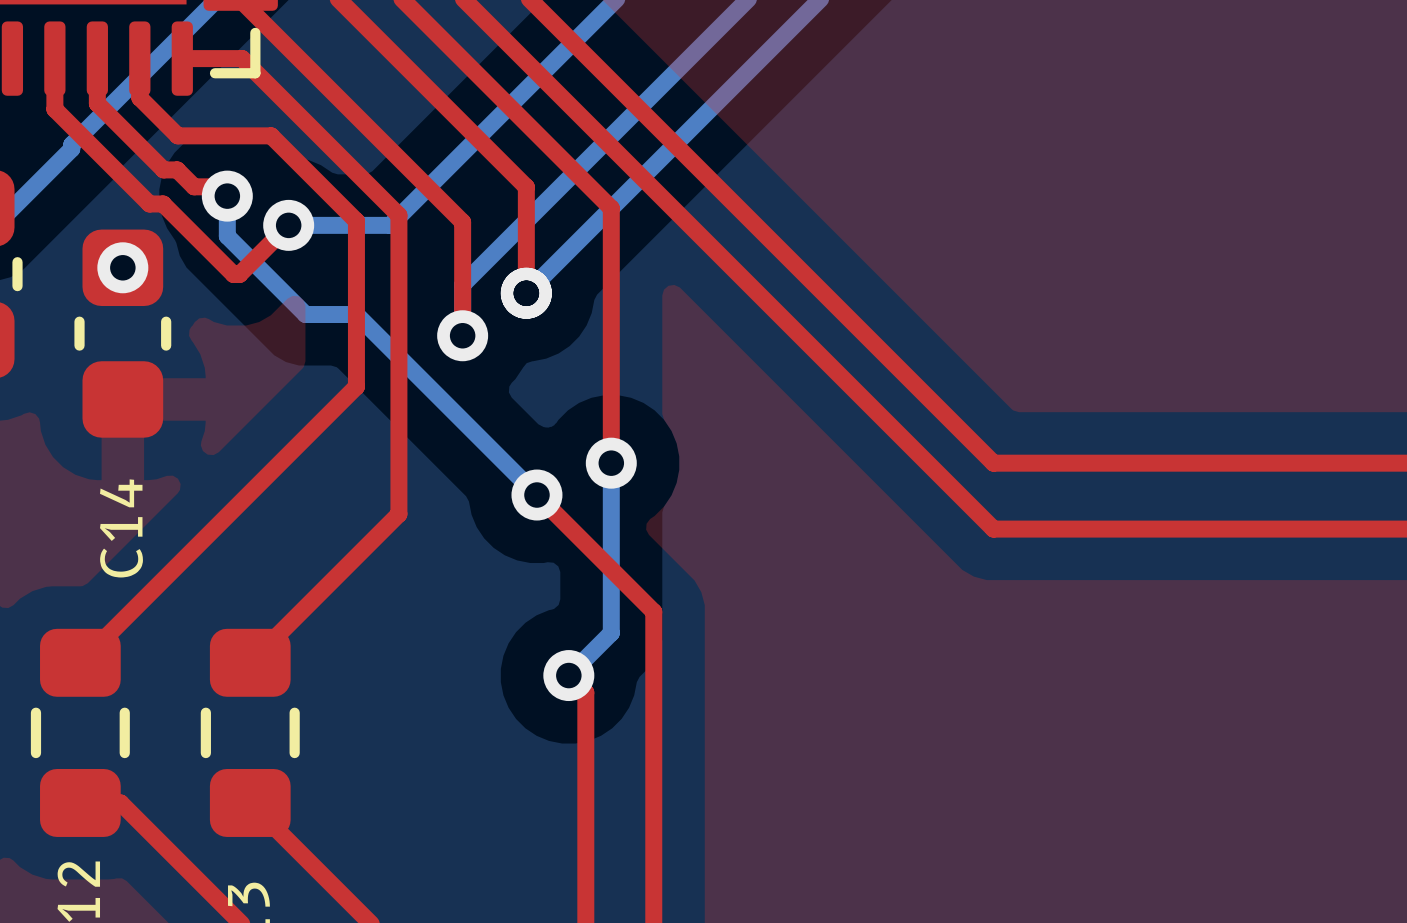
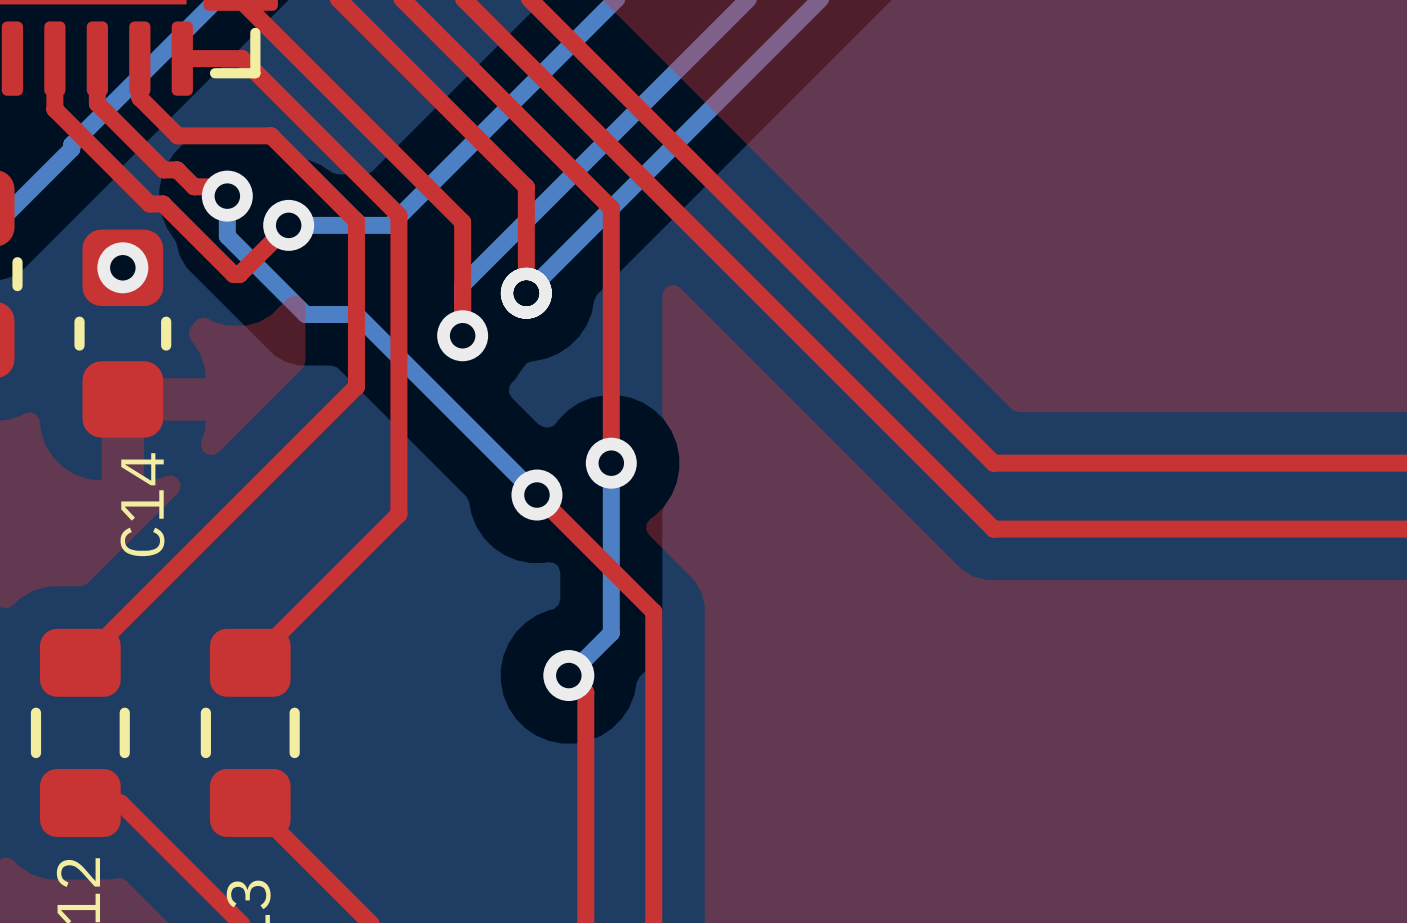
C14 name position: C14 (121, 528) -> C14 (142, 504)

